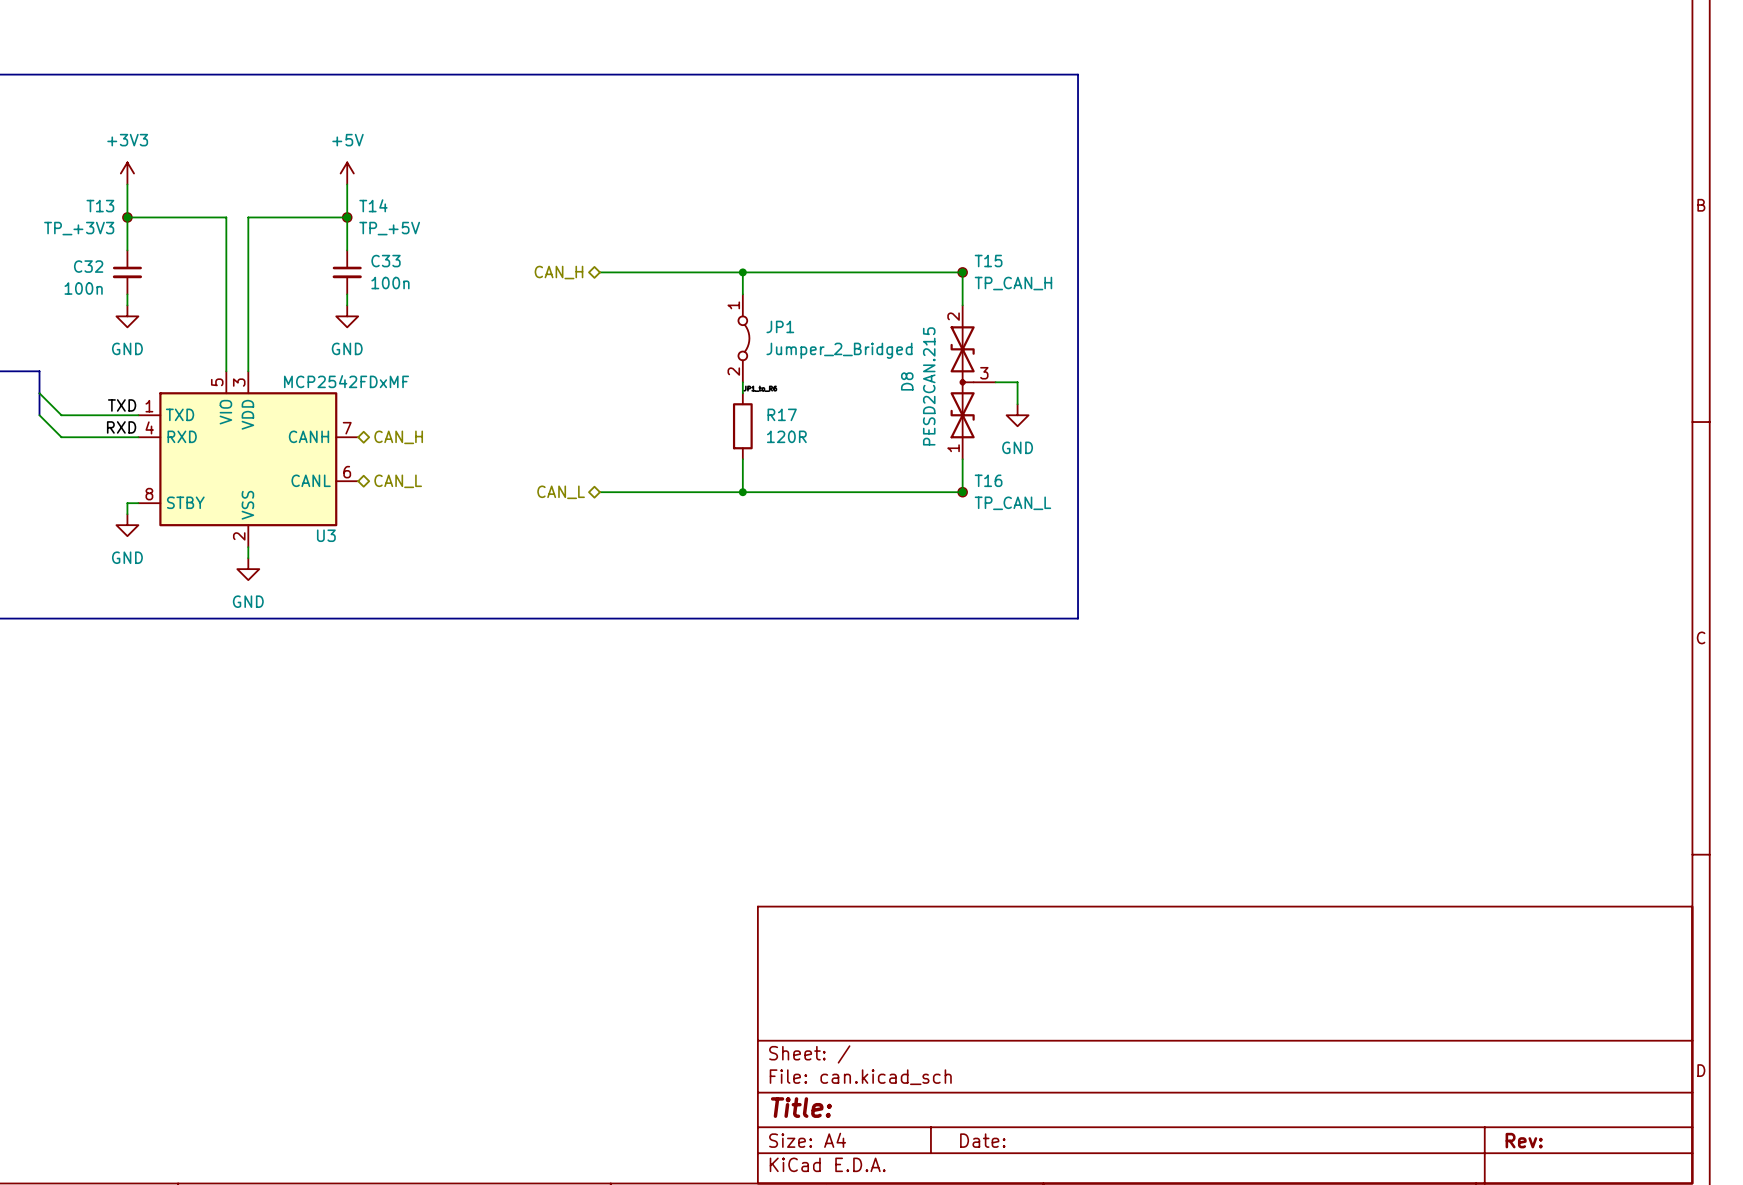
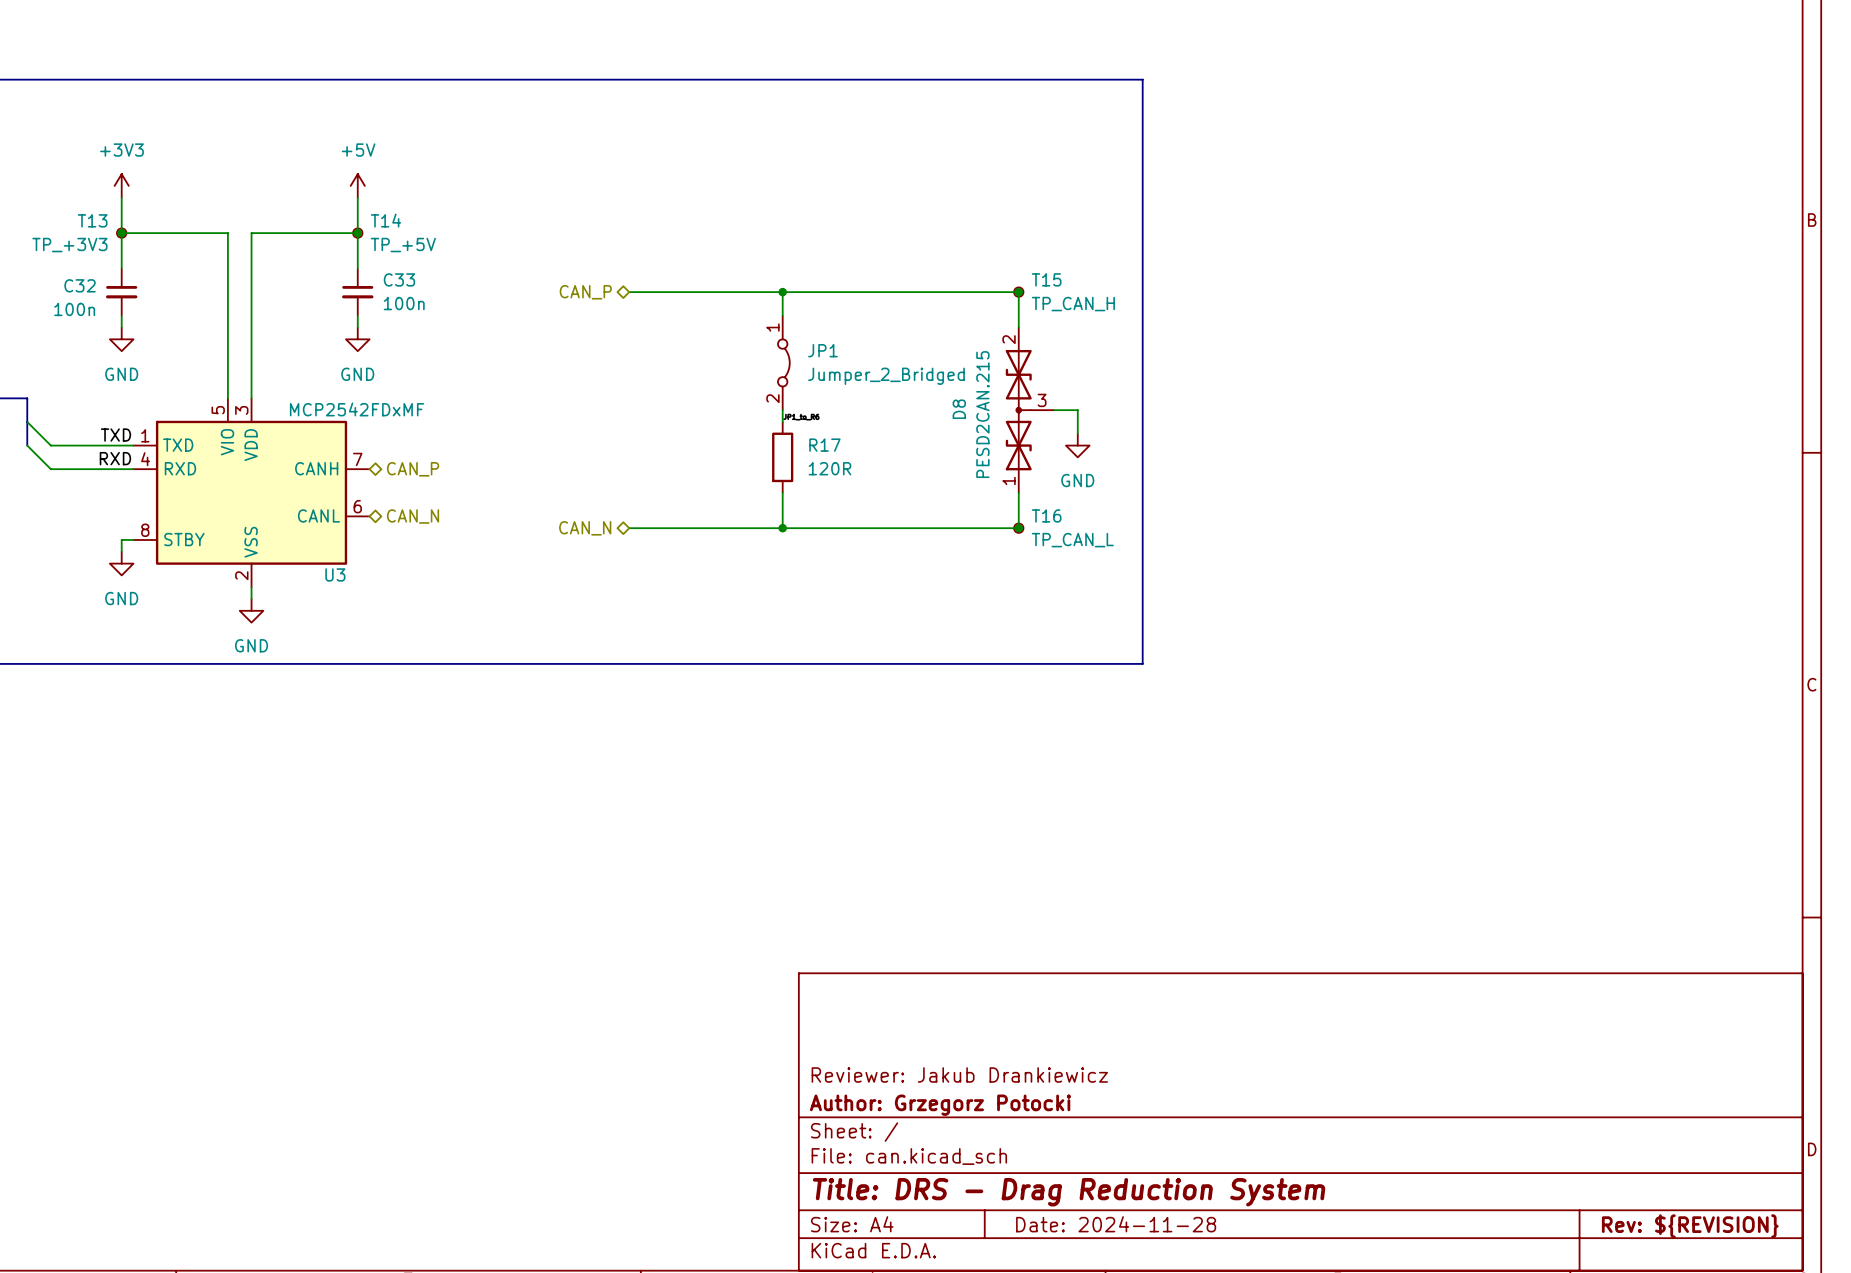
hierarchical label: CAN_H (558, 272) -> CAN_P (585, 292)
hierarchical label: CAN_H (398, 437) -> CAN_P (413, 469)
hierarchical label: CAN_L (398, 481) -> CAN_N (413, 516)
hierarchical label: CAN_L (561, 492) -> CAN_N (585, 528)
title block: none -> Reviewer: Jakub Drankiewicz (959, 1074)
title block: none -> Author: Grzegorz Potocki (940, 1105)
title block: Title: (801, 1107) -> Title: DRS - Drag Reduction System (1069, 1192)
title block: Date: (982, 1140) -> Date: 2024-11-28 (1116, 1224)
title block: Rev: (1524, 1140) -> Rev: ${REVISION} (1690, 1226)

